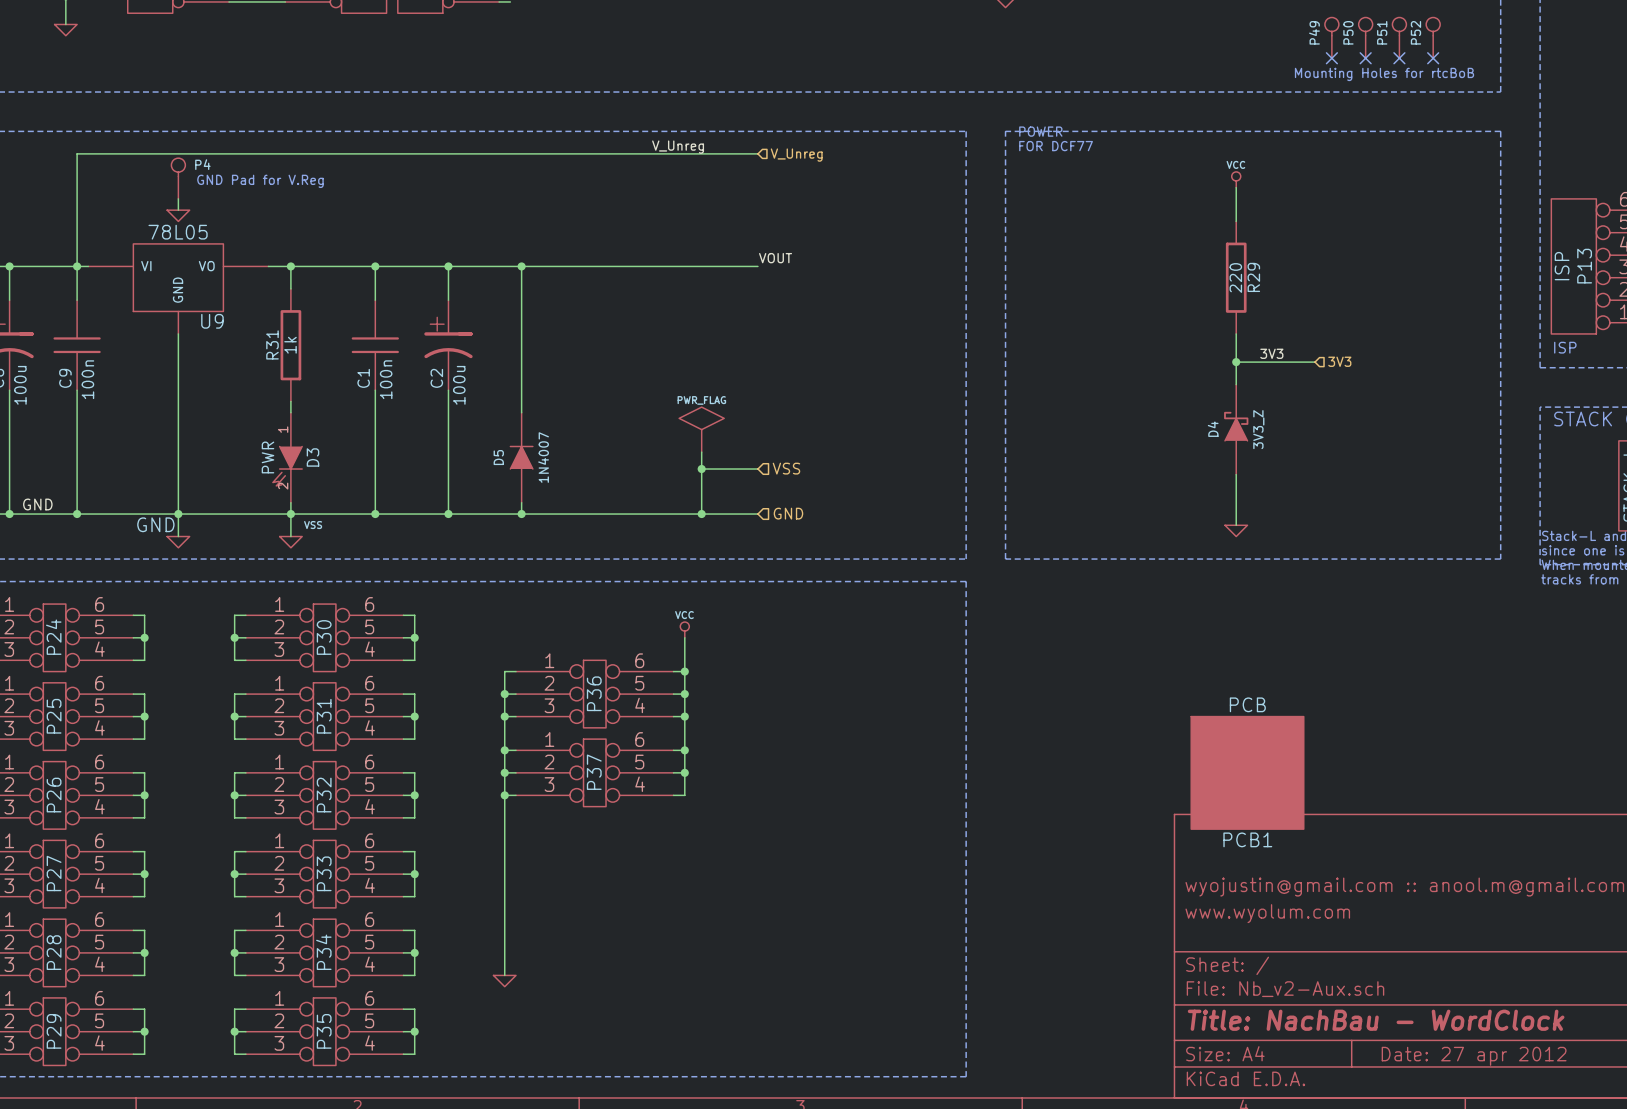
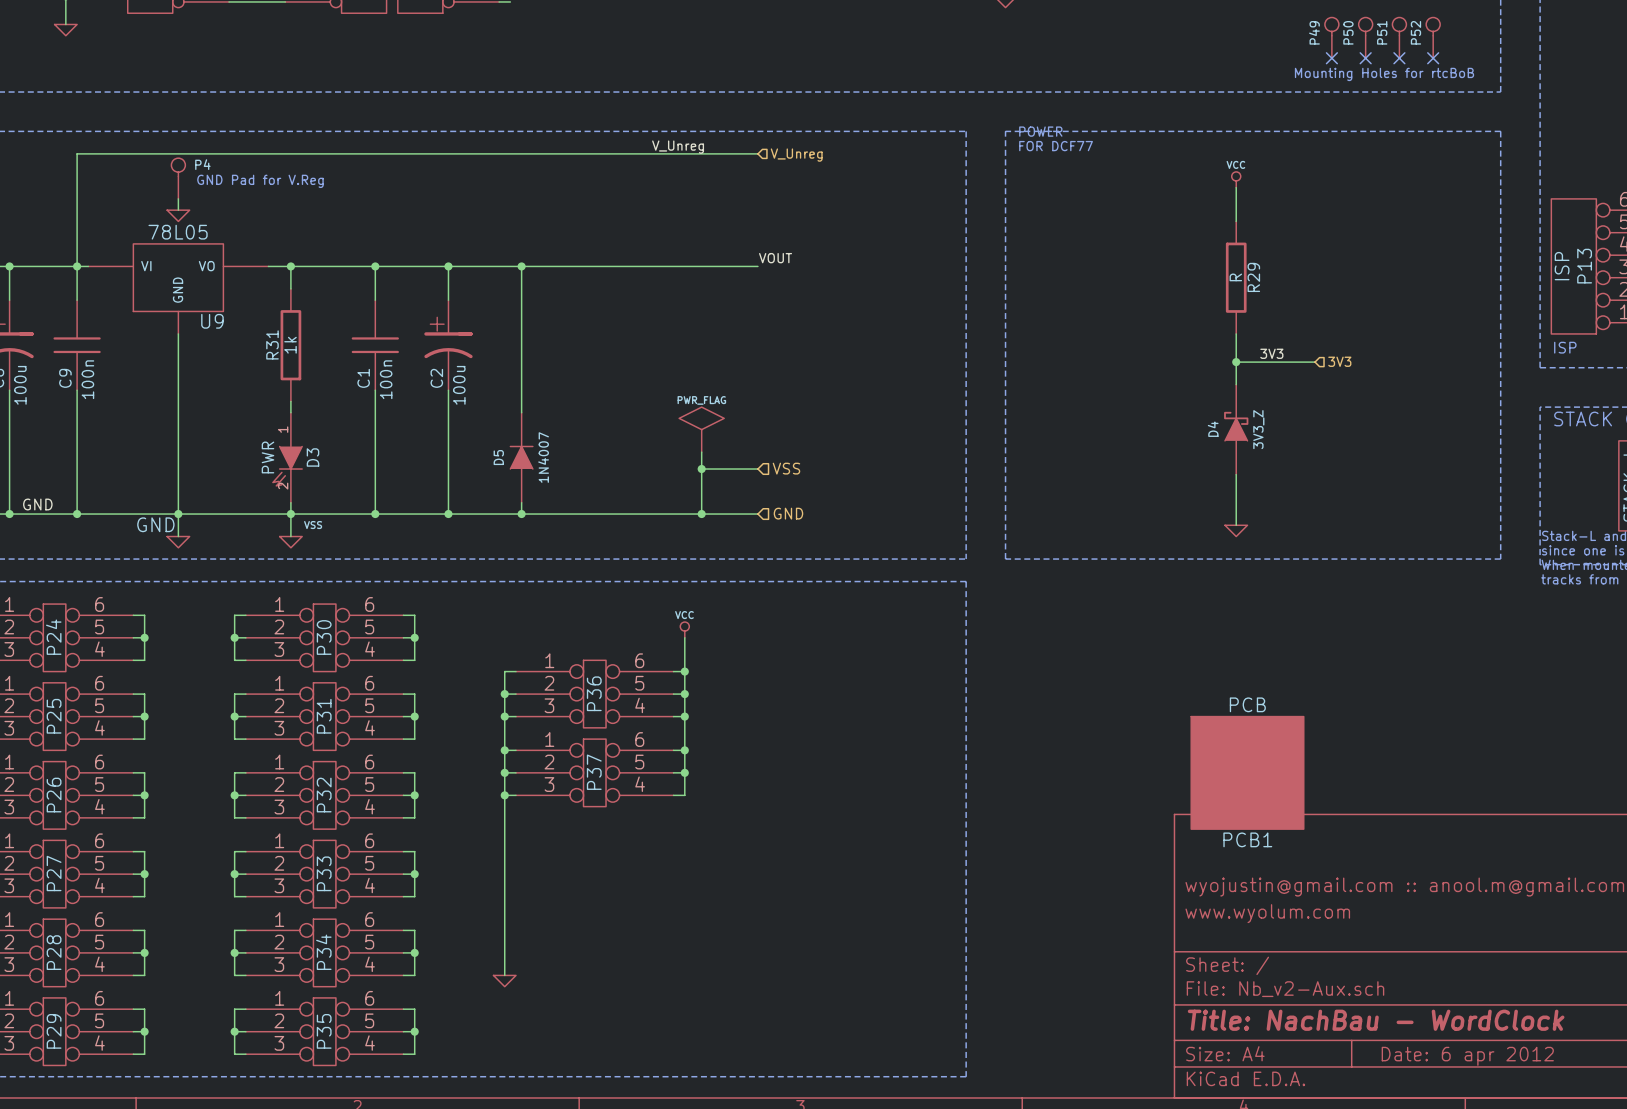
R29 value: 220 (1235, 277) -> R (1235, 277)
title block: Date: 27 apr 2012 (1474, 1056) -> Date: 6 apr 2012 (1467, 1056)

